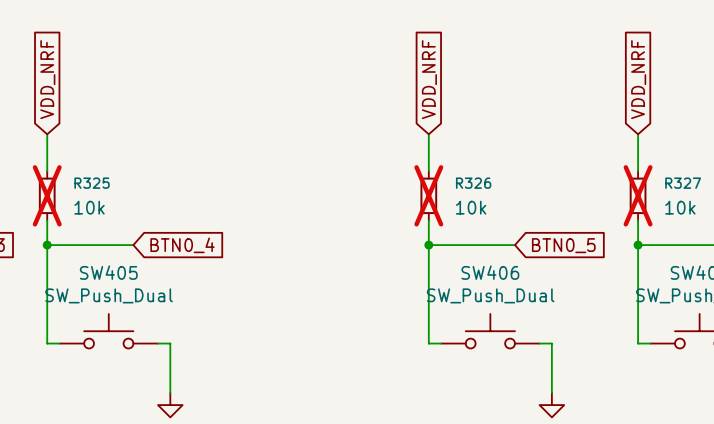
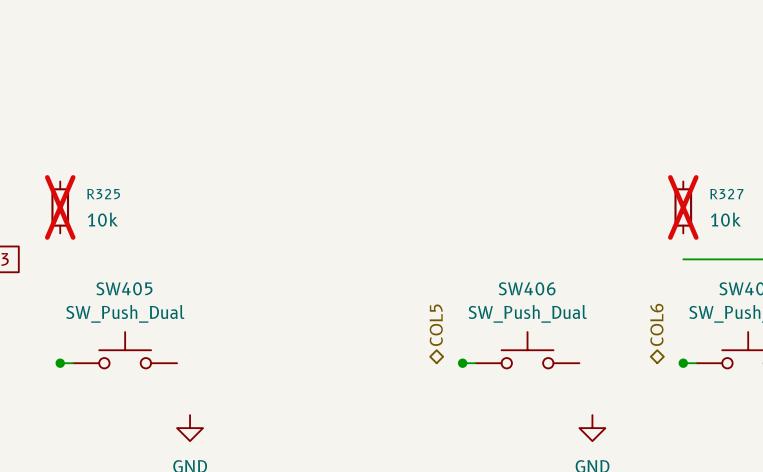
global label: VDD_NRF (47, 79) -> none
global label: VDD_NRF (429, 79) -> none
global label: VDD_NRF (638, 79) -> none
wire: (47, 134) (47, 171) -> none
wire: (428, 134) (428, 171) -> none
wire: (638, 134) (638, 171) -> none
R326: 10k (428, 195) -> none
wire: (47, 220) (47, 343) -> none
wire: (428, 220) (428, 343) -> none
wire: (638, 220) (638, 343) -> none
wire: (47, 245) (133, 245) -> none
junction: (47, 245) -> none
global label: BTN0_4 (182, 245) -> none
wire: (428, 245) (514, 245) -> none
junction: (428, 245) -> none
global label: BTN0_5 (563, 245) -> none
junction: (638, 245) -> none
hierarchical label: none -> COL5 (436, 325)
hierarchical label: none -> COL6 (656, 324)
junction: none -> (60, 363)
wire: (158, 343) (170, 343) (170, 392) -> none
junction: none -> (462, 363)
wire: (539, 343) (551, 343) (551, 392) -> none
junction: none -> (683, 363)

